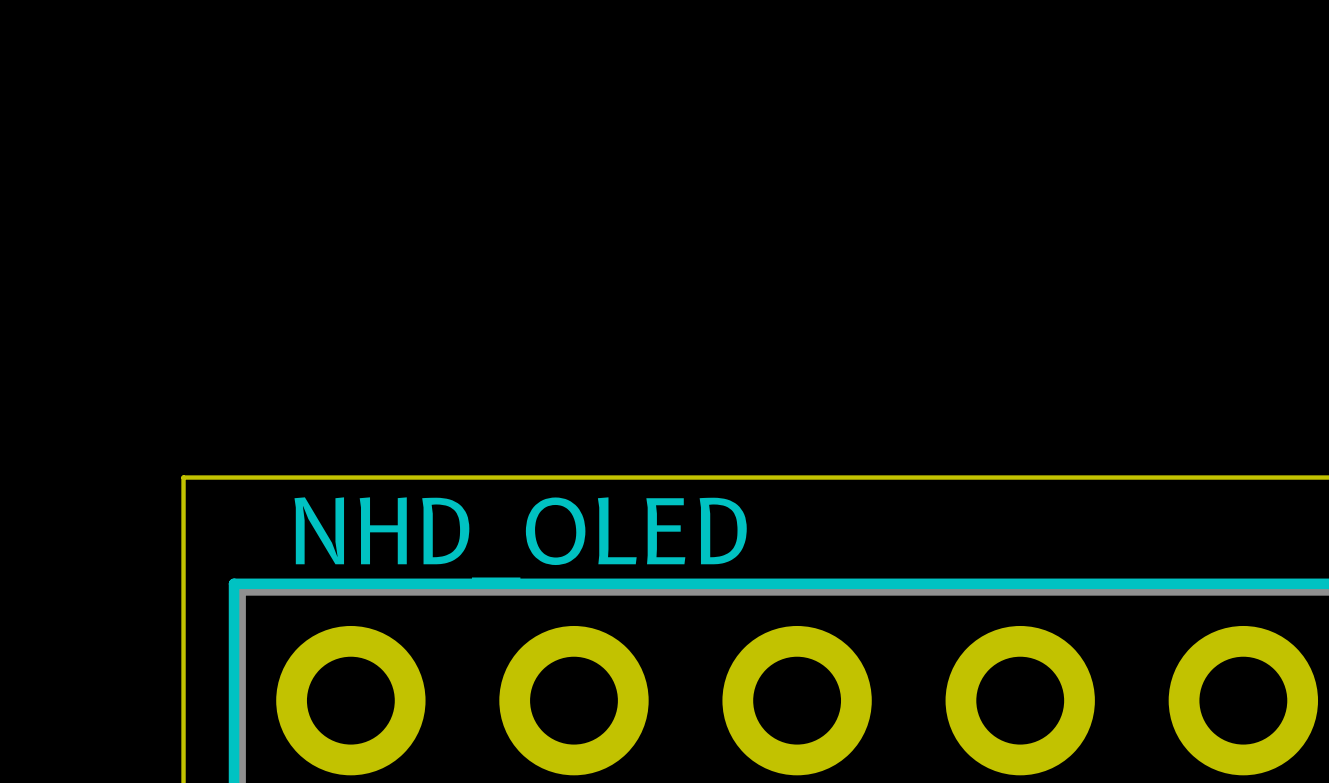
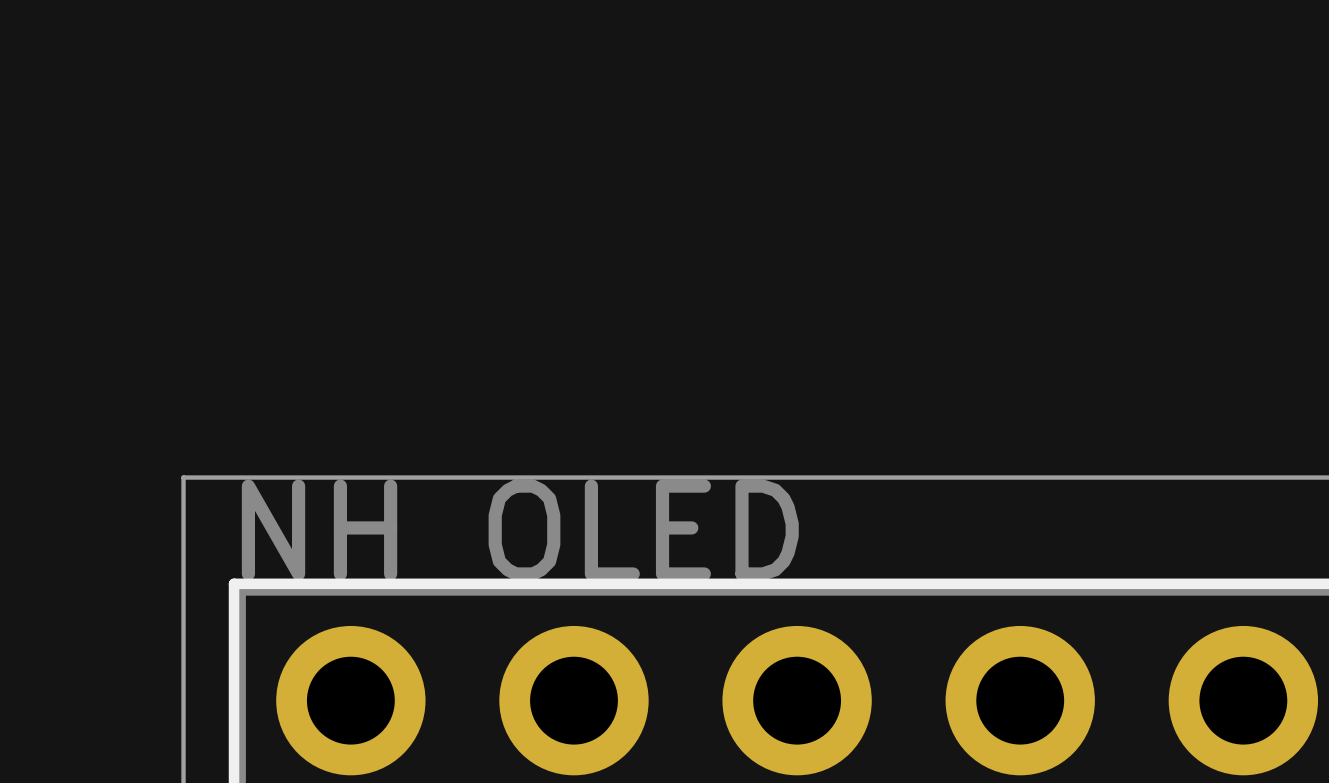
part value: NHD_OLED (520, 540) -> NH OLED (520, 530)

